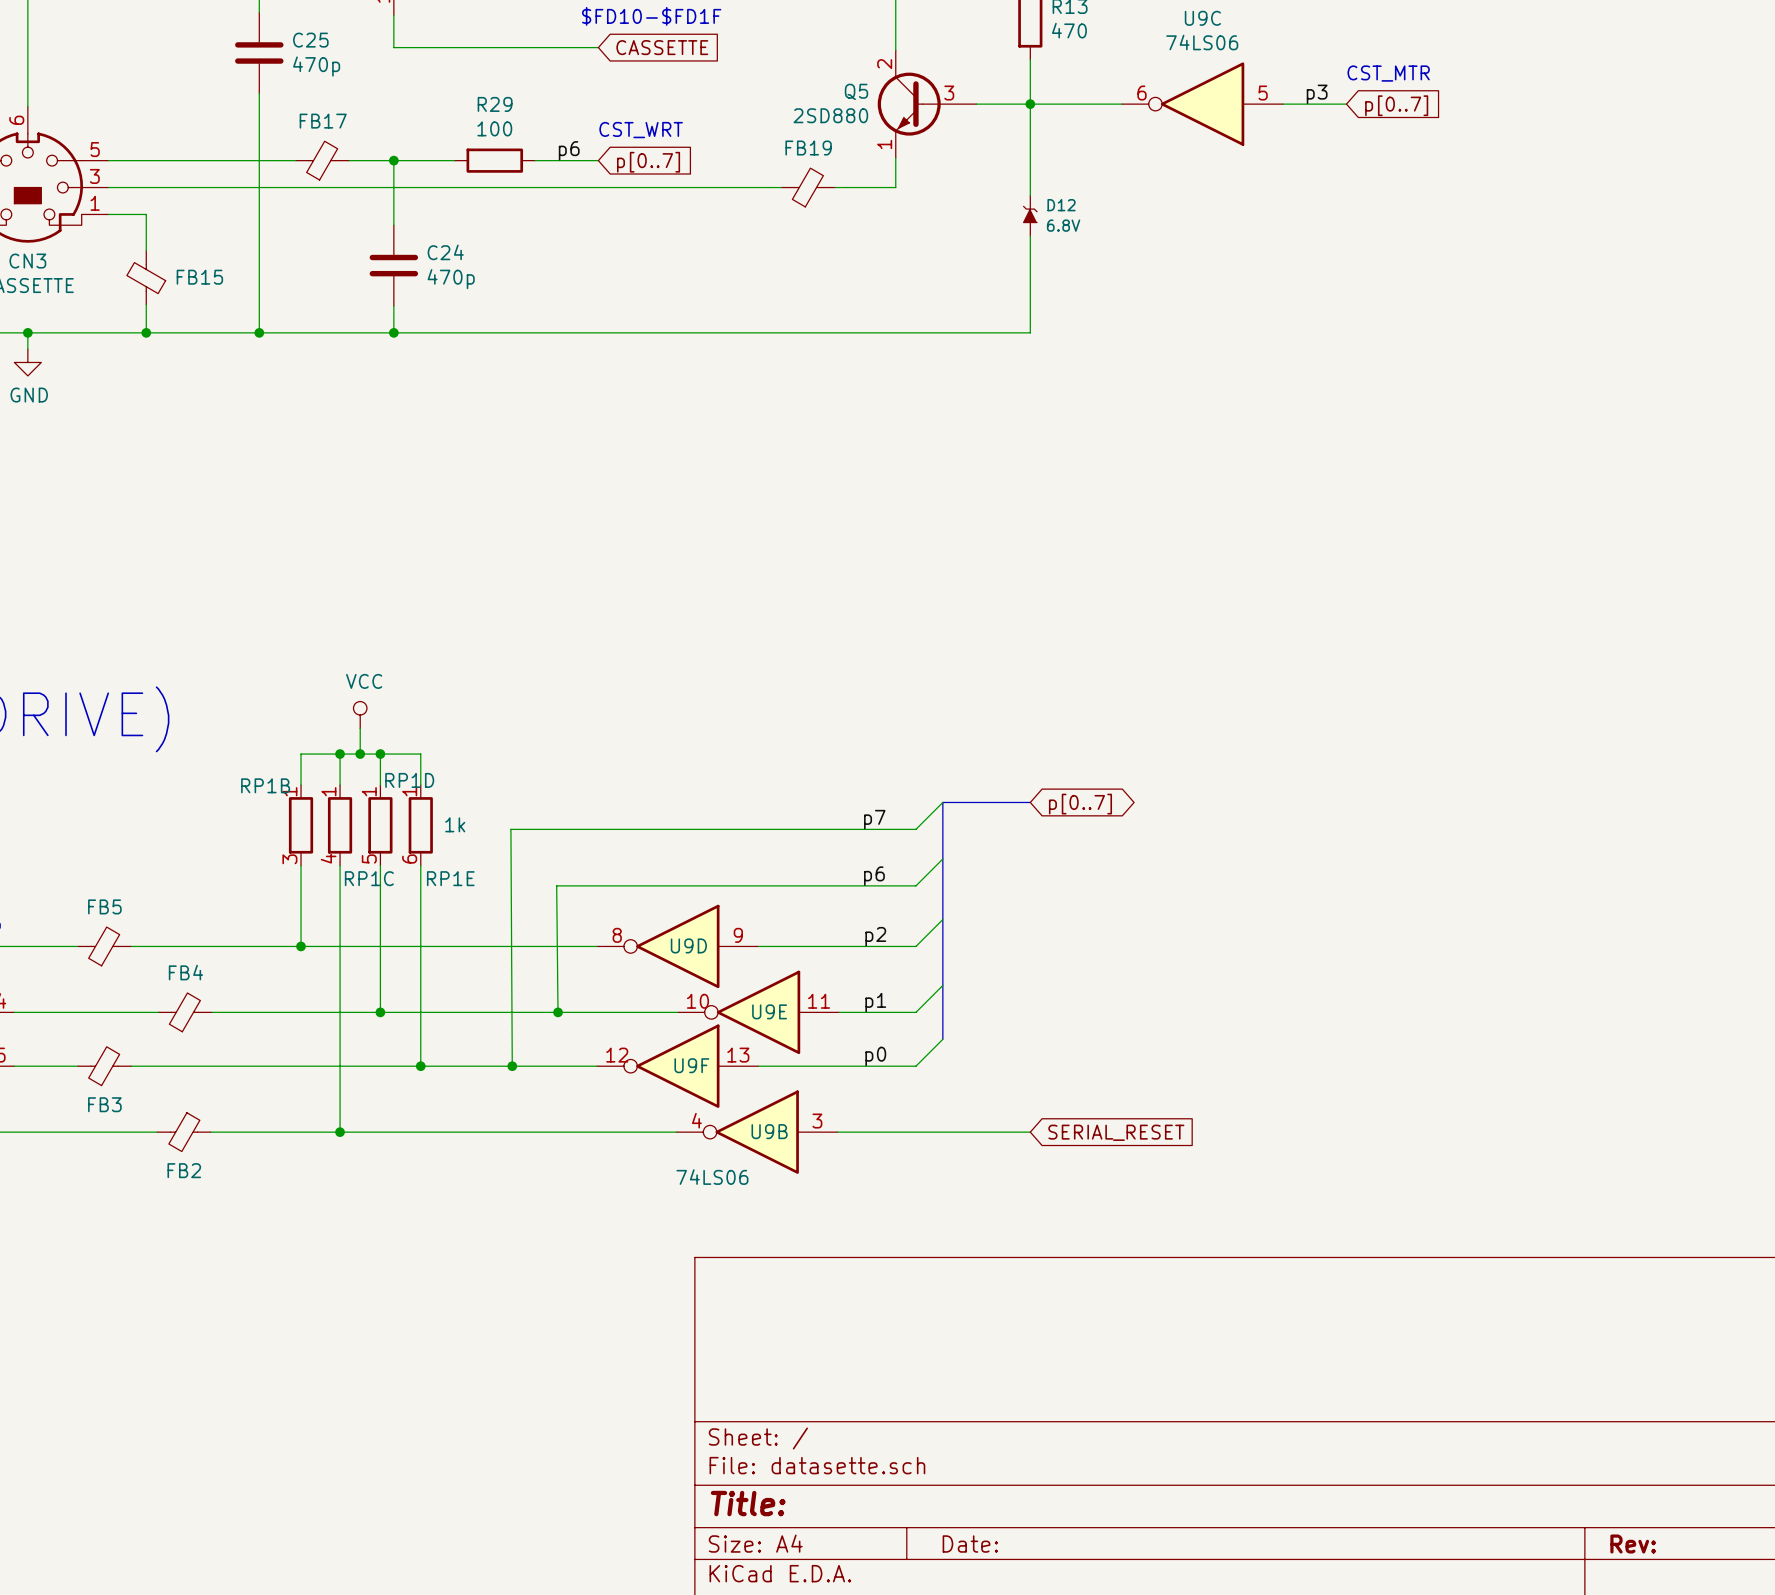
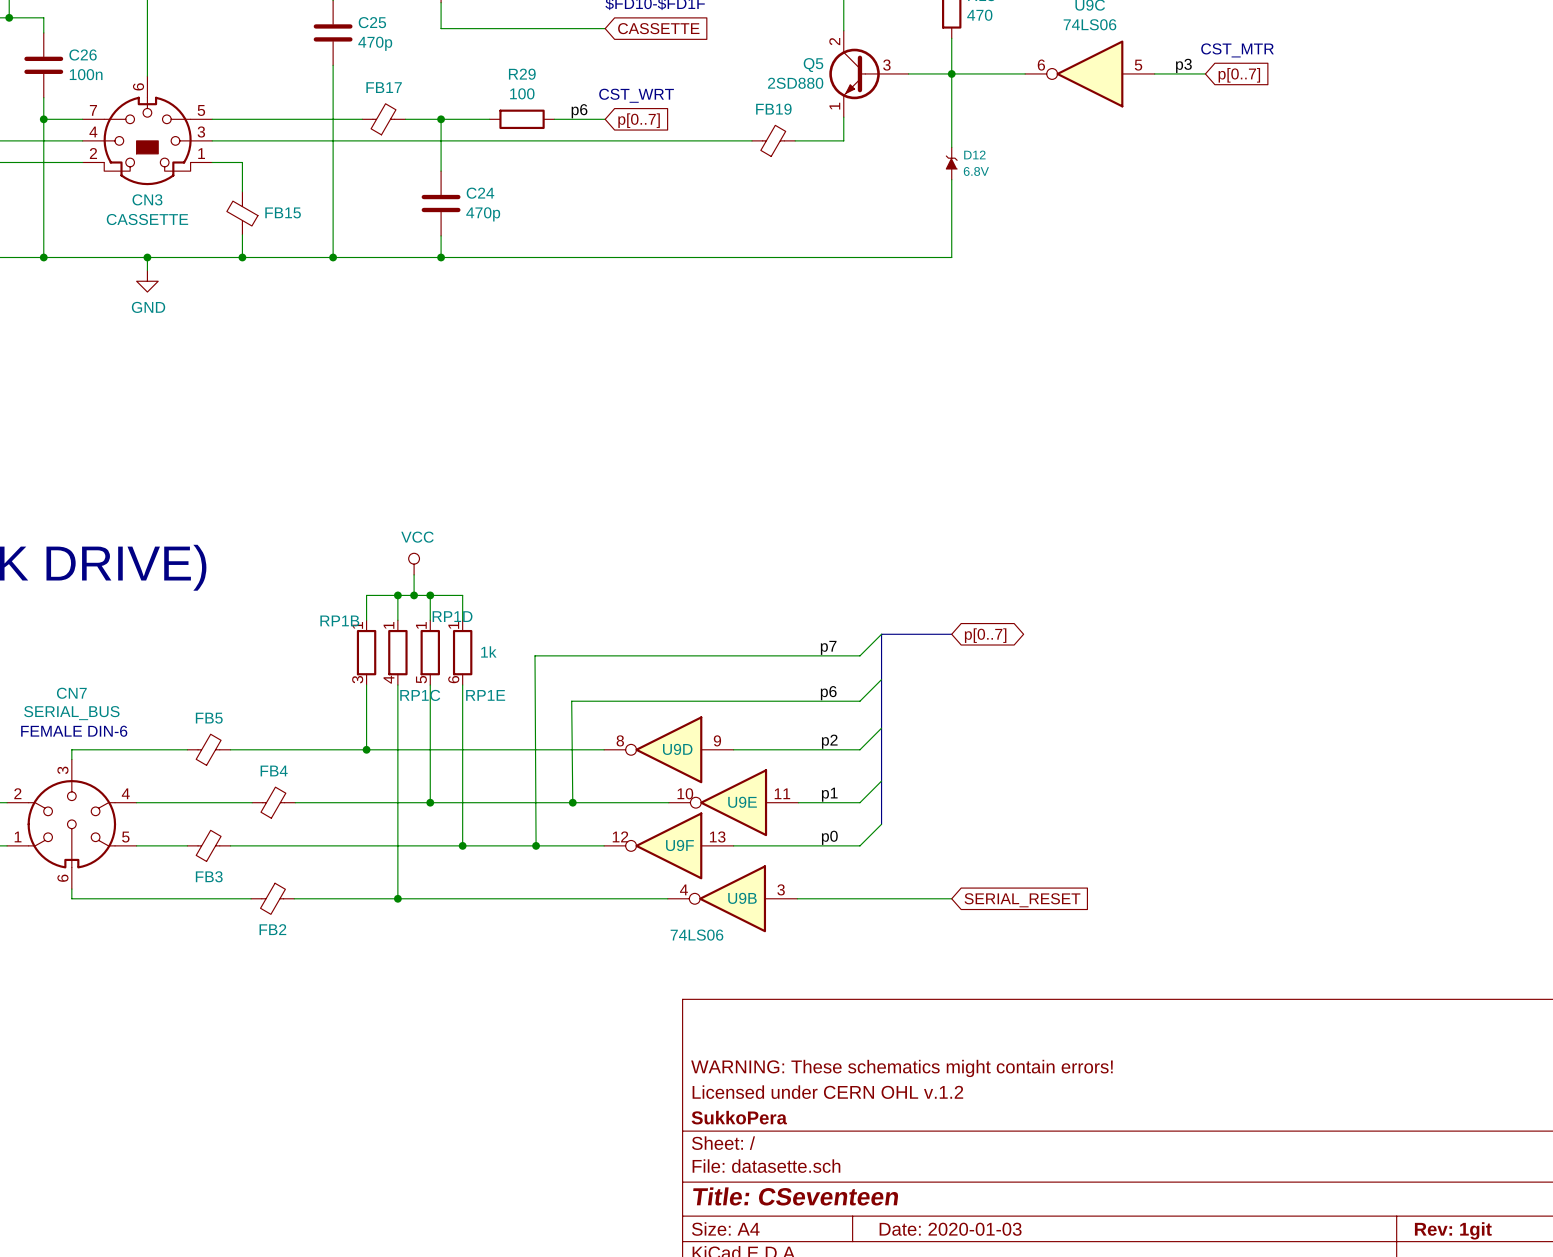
title block: none -> WARNING: These schematics might contain errors! (901, 1068)
title block: none -> Licensed under CERN OHL v.1.2 (827, 1092)
title block: none -> SukkoPera (739, 1117)
title block: Title: (748, 1503) -> Title: CSeventeen (795, 1196)
title block: Date: (970, 1544) -> Date: 2020-01-03 (950, 1229)
title block: Rev: (1633, 1544) -> Rev: 1git (1453, 1230)

